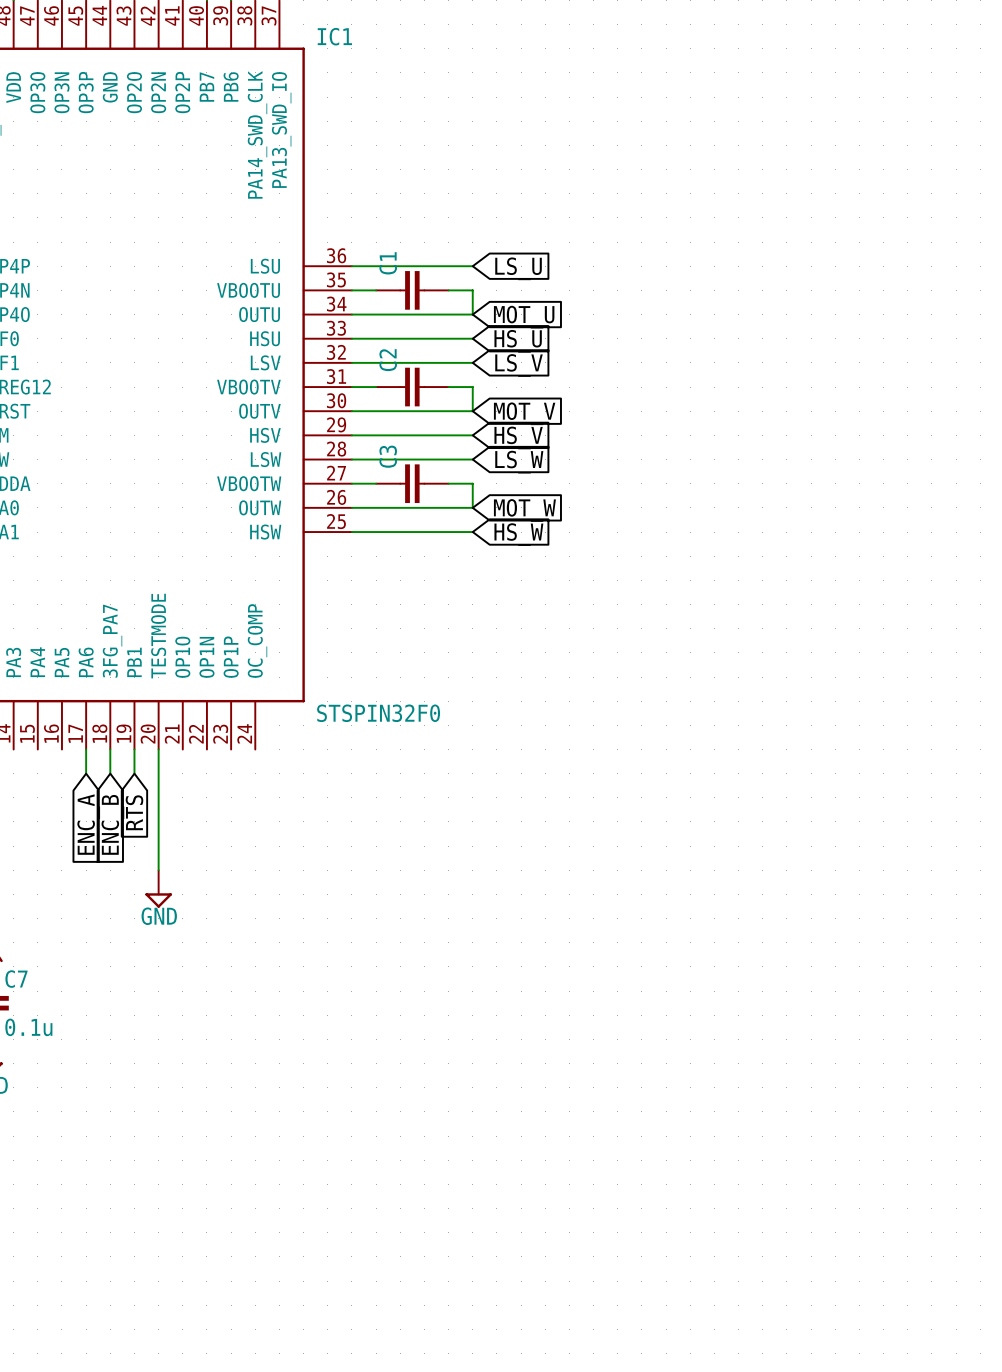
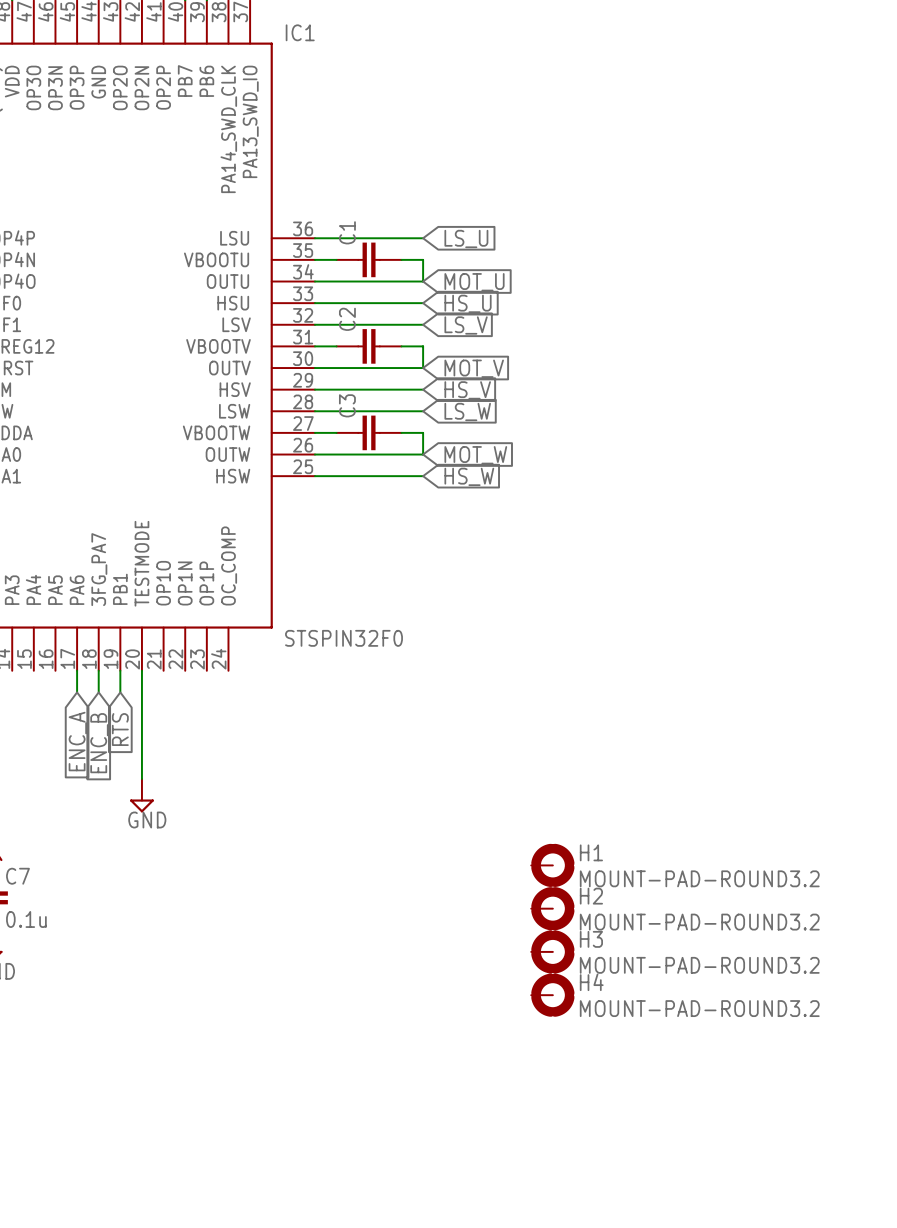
H1: none -> MOUNT-PAD-ROUND3.2 (552, 865)
H2: none -> MOUNT-PAD-ROUND3.2 (552, 908)
H3: none -> MOUNT-PAD-ROUND3.2 (552, 951)
H4: none -> MOUNT-PAD-ROUND3.2 (552, 995)

